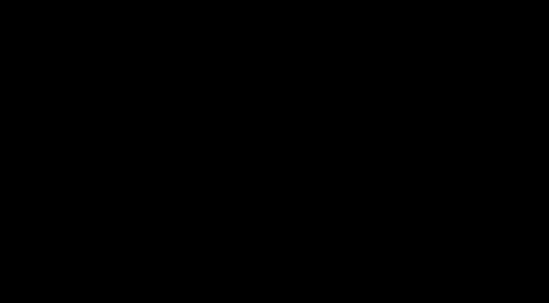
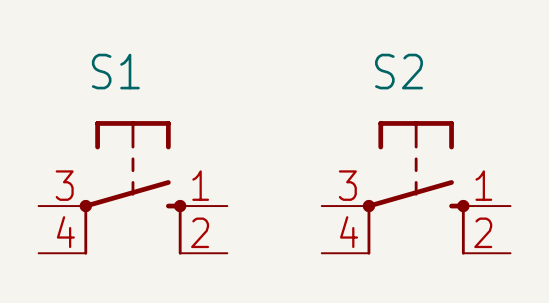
S1: none -> (132, 187)
S2: none -> (416, 187)

